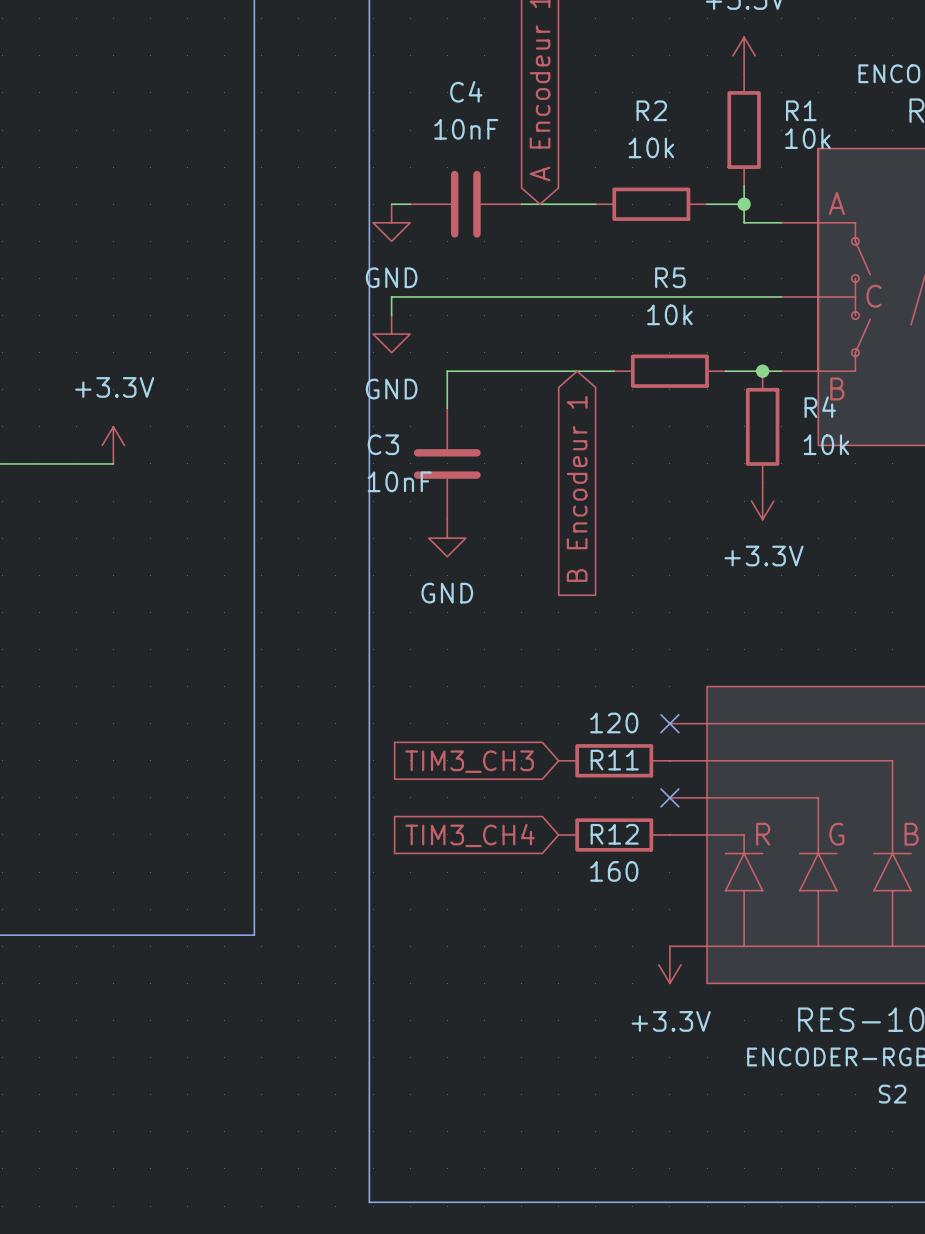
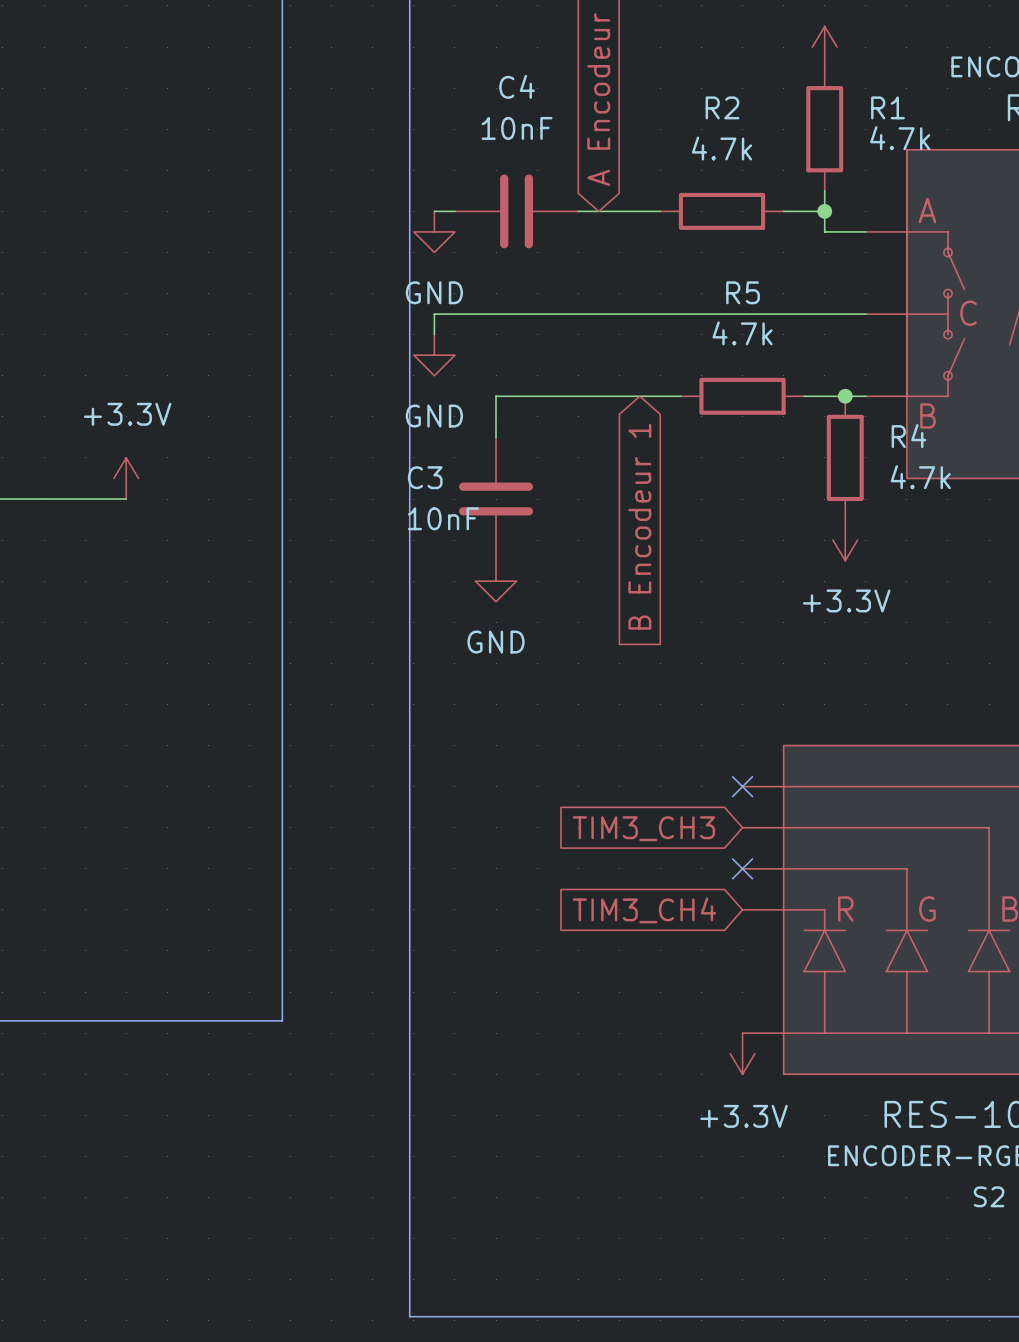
R1 value: 10k (807, 138) -> 4.7k (900, 138)
R2 value: 10k (651, 147) -> 4.7k (722, 148)
R5 value: 10k (669, 314) -> 4.7k (742, 333)
R4 value: 10k (826, 444) -> 4.7k (920, 477)
R11: 120 (614, 760) -> none
global label position: TIM3_CH3 (469, 761) -> TIM3_CH3 (643, 828)
R12: 160 (614, 834) -> none
global label position: TIM3_CH4 (470, 835) -> TIM3_CH4 (644, 910)

